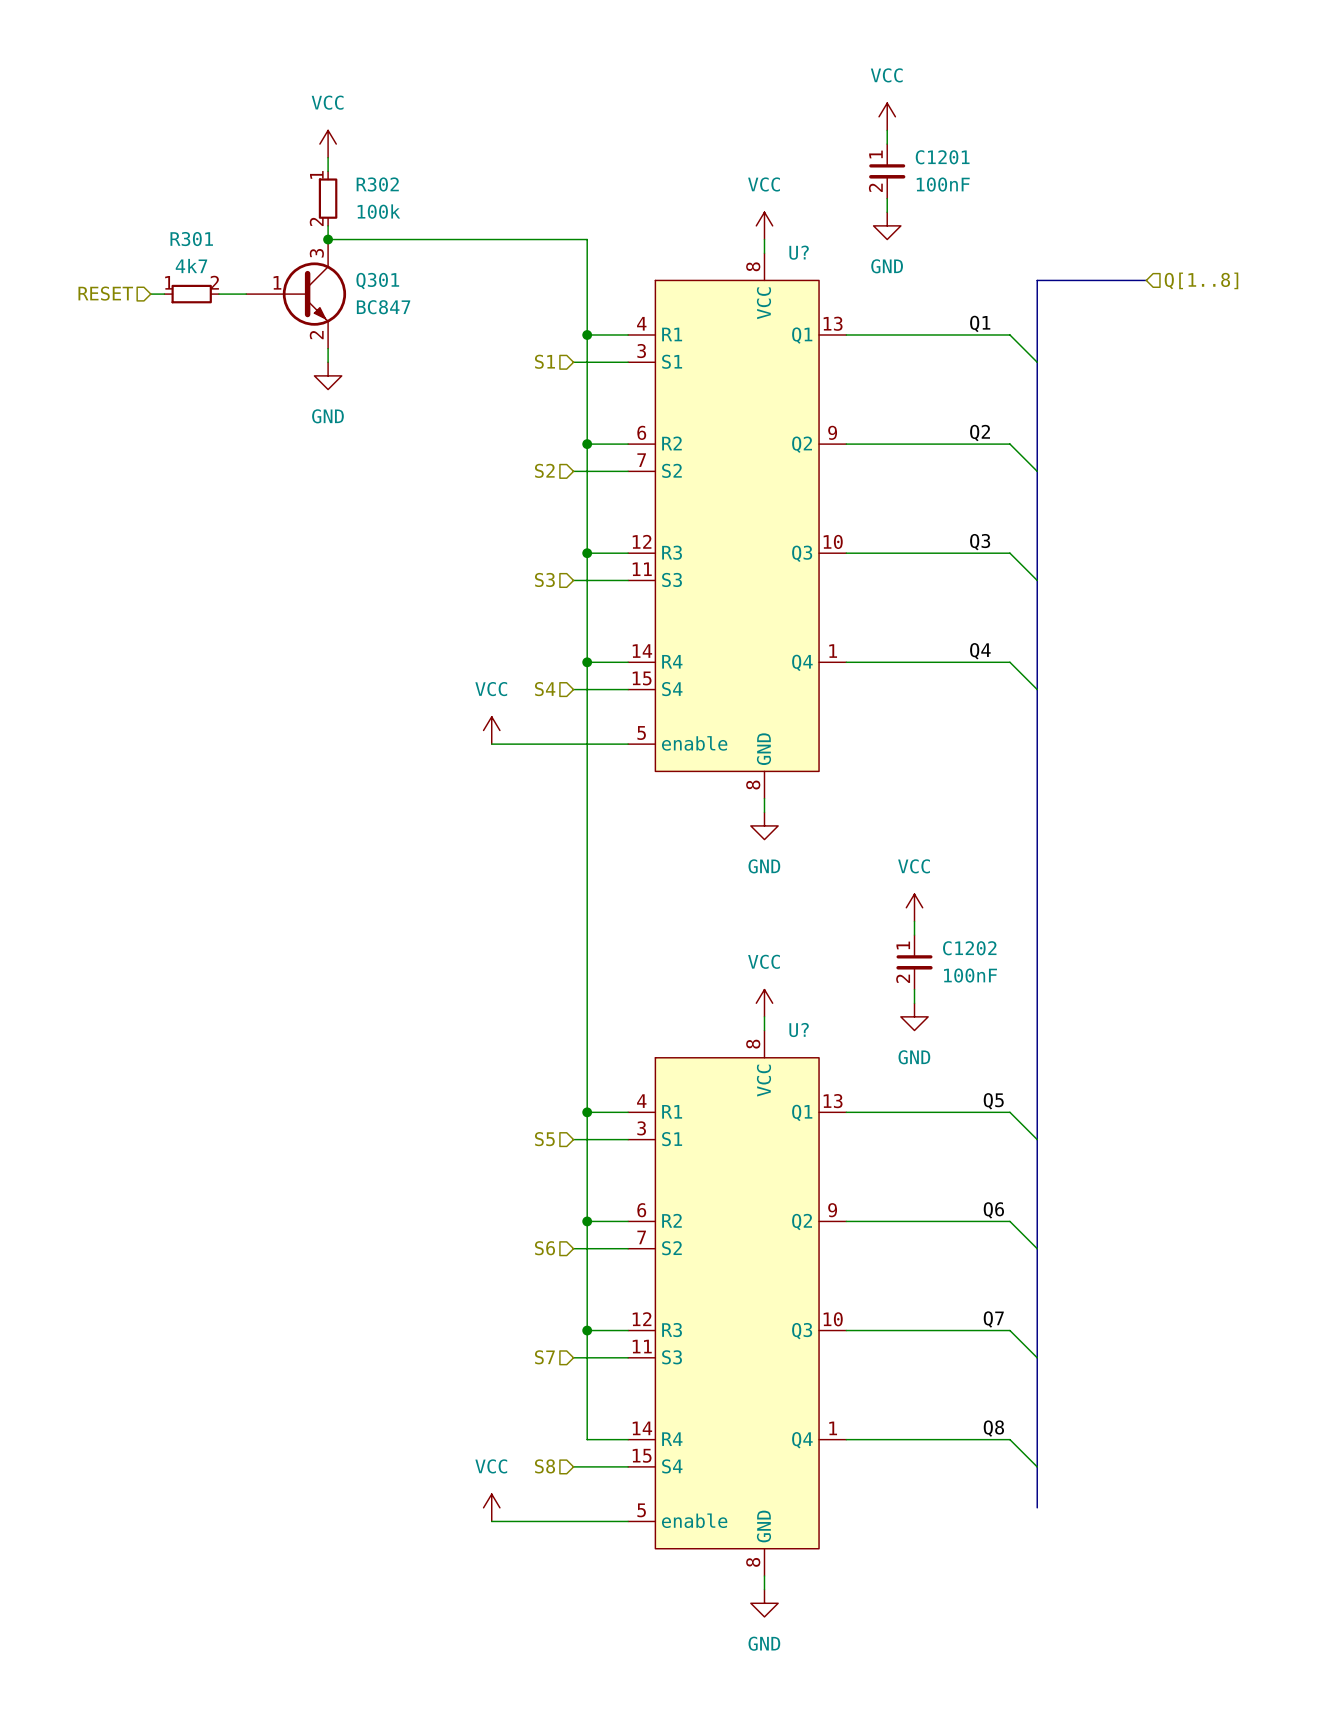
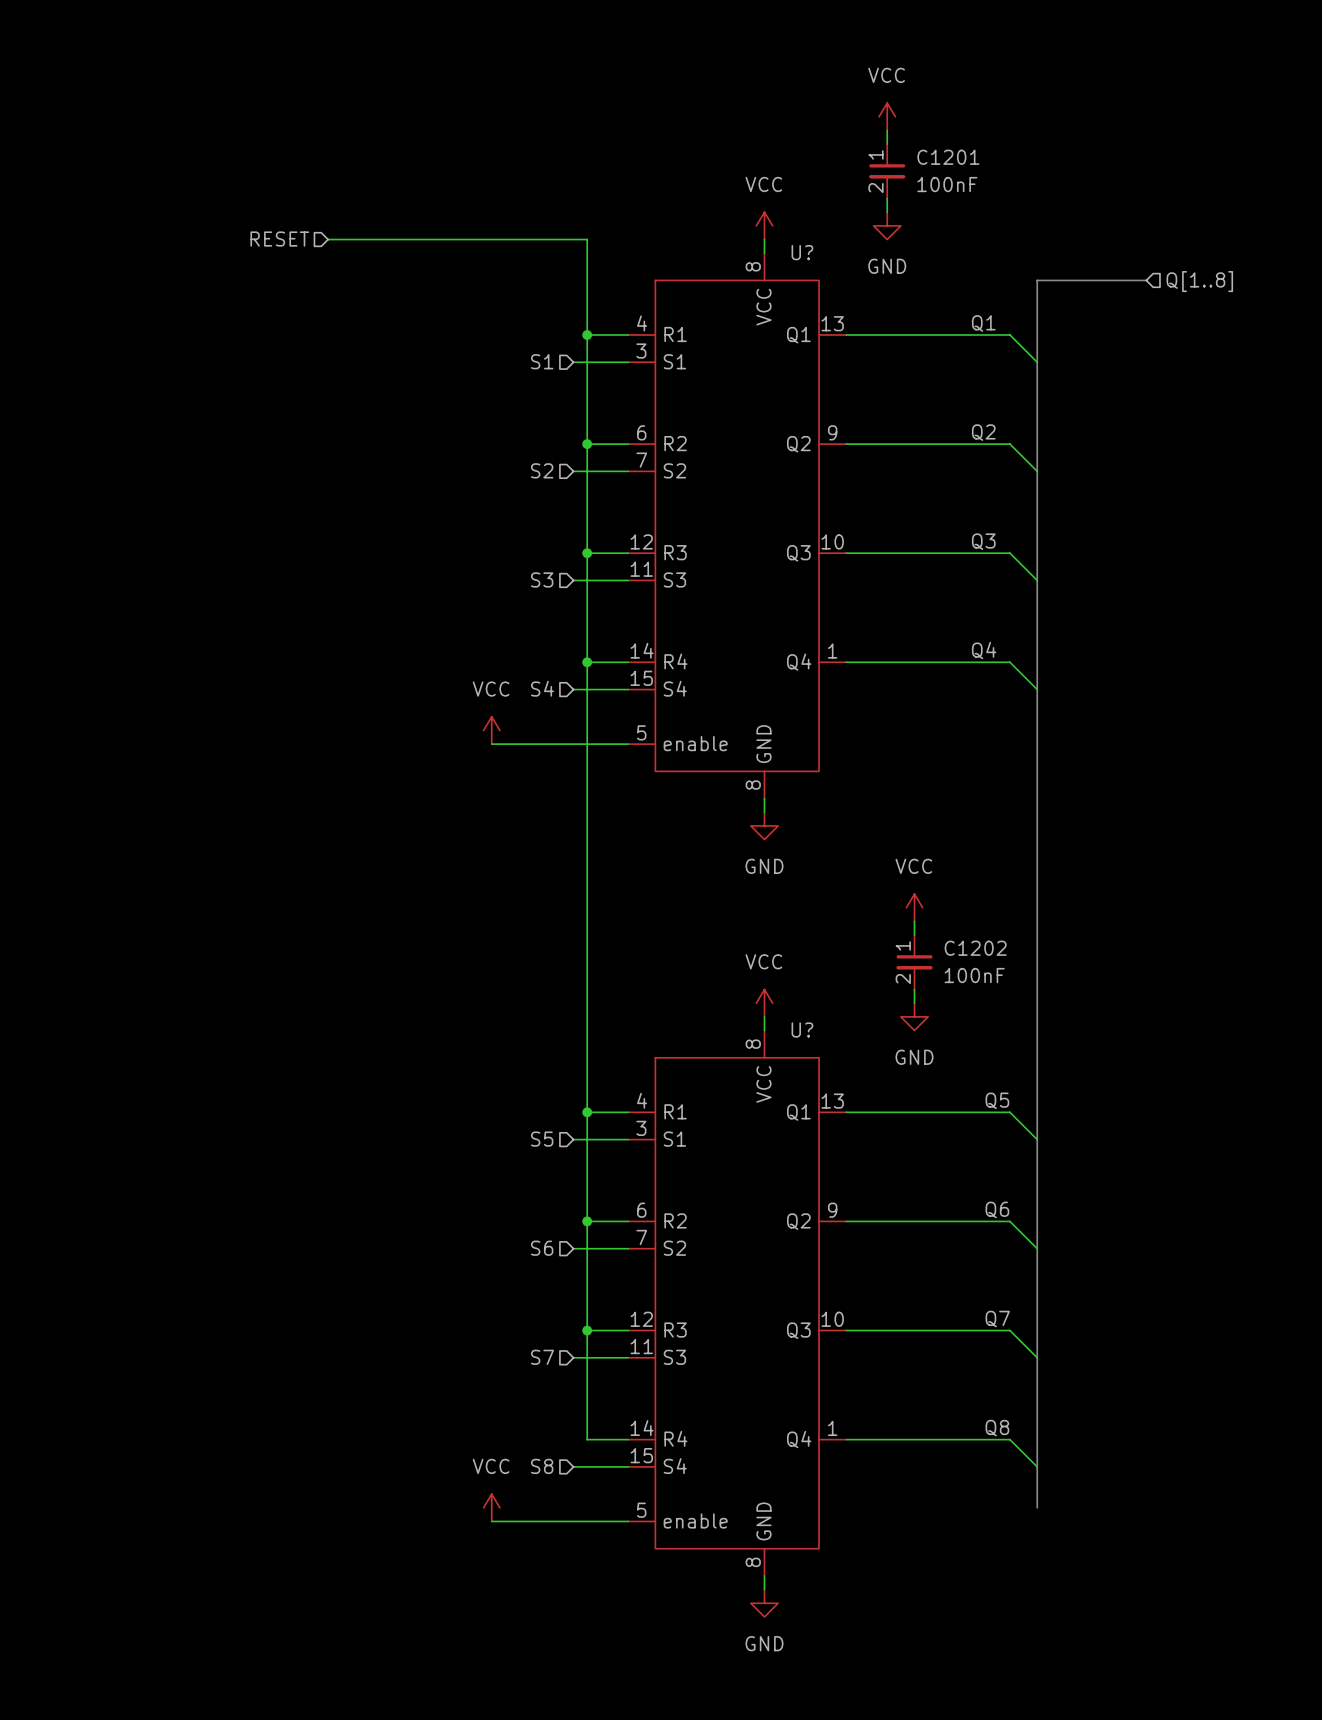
power symbol: VCC (328, 144) -> none
wire: (328, 157) (328, 171) -> none
R302: 100k (328, 198) -> none
wire: (328, 225) (328, 239) -> none
junction: (328, 239) -> none
hierarchical label position: RESET (105, 293) -> RESET (279, 239)
wire: (150, 294) (164, 294) -> none
R301: 4k7 (191, 294) -> none
wire: (218, 294) (246, 294) -> none
Q301: BC847 (296, 294) -> none
wire: (328, 348) (328, 362) -> none
power symbol: GND (328, 375) -> none

